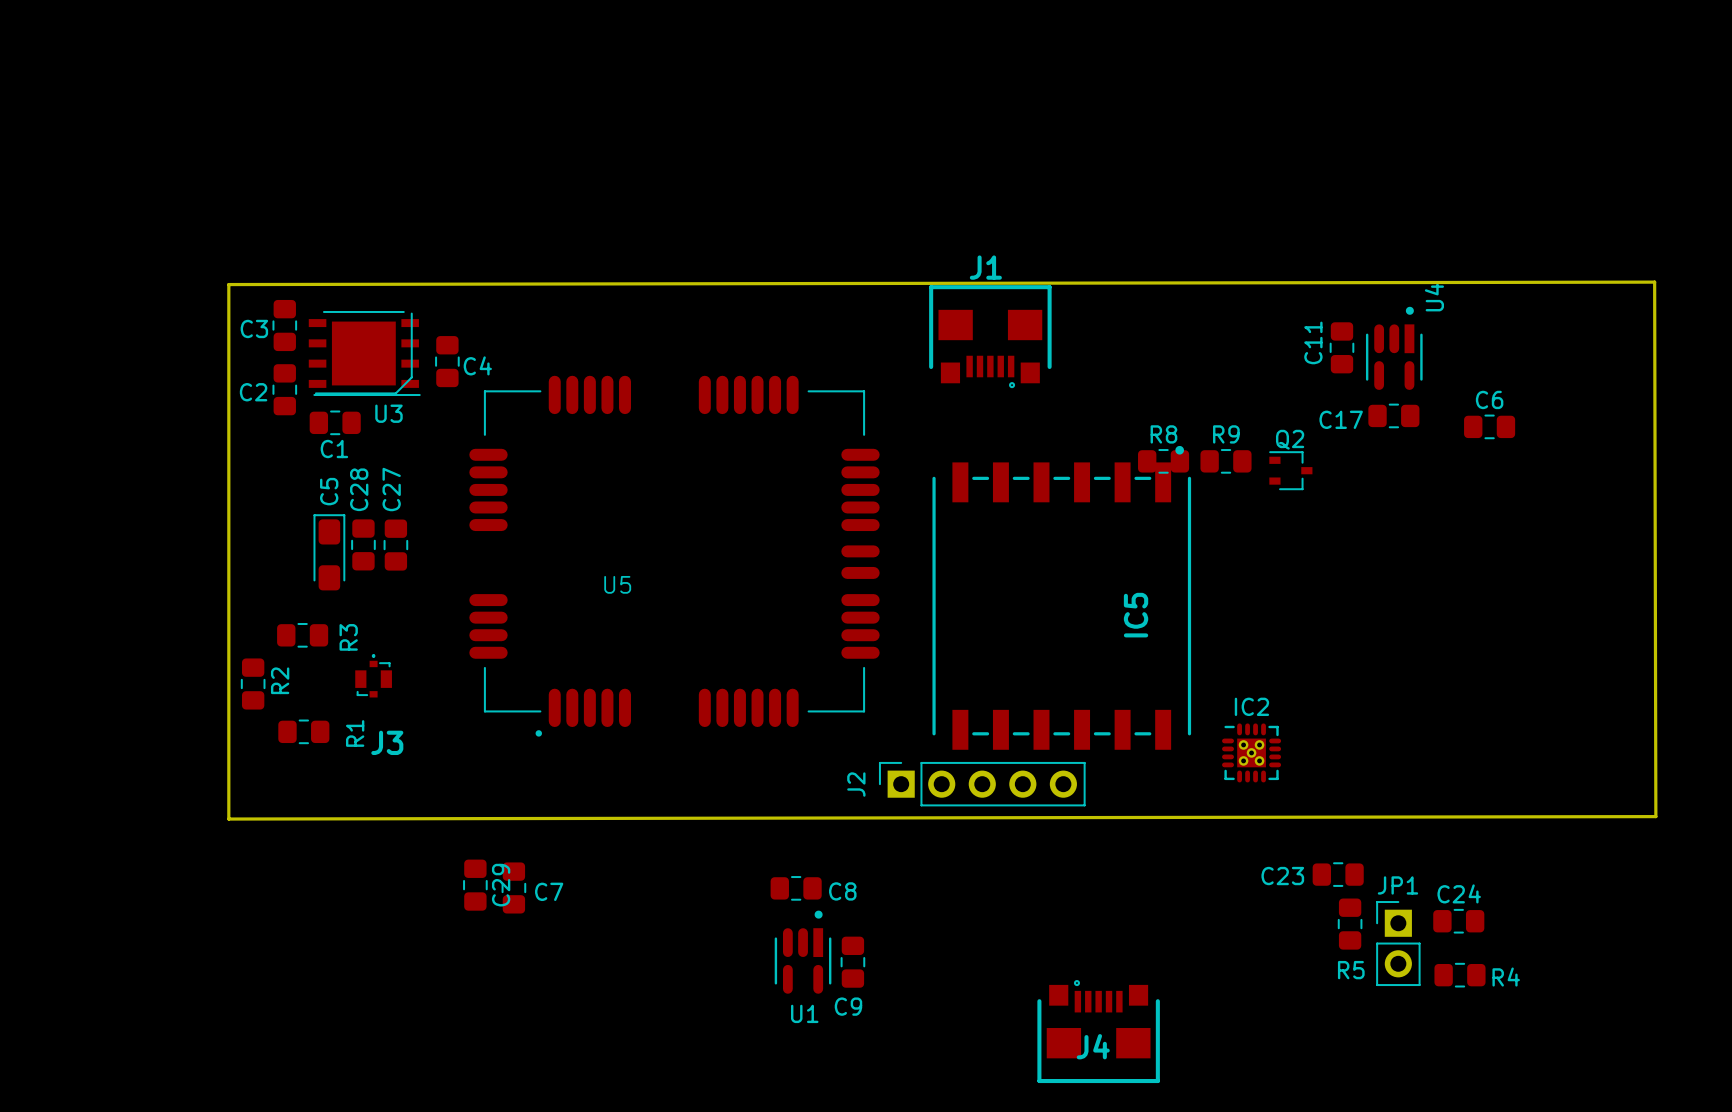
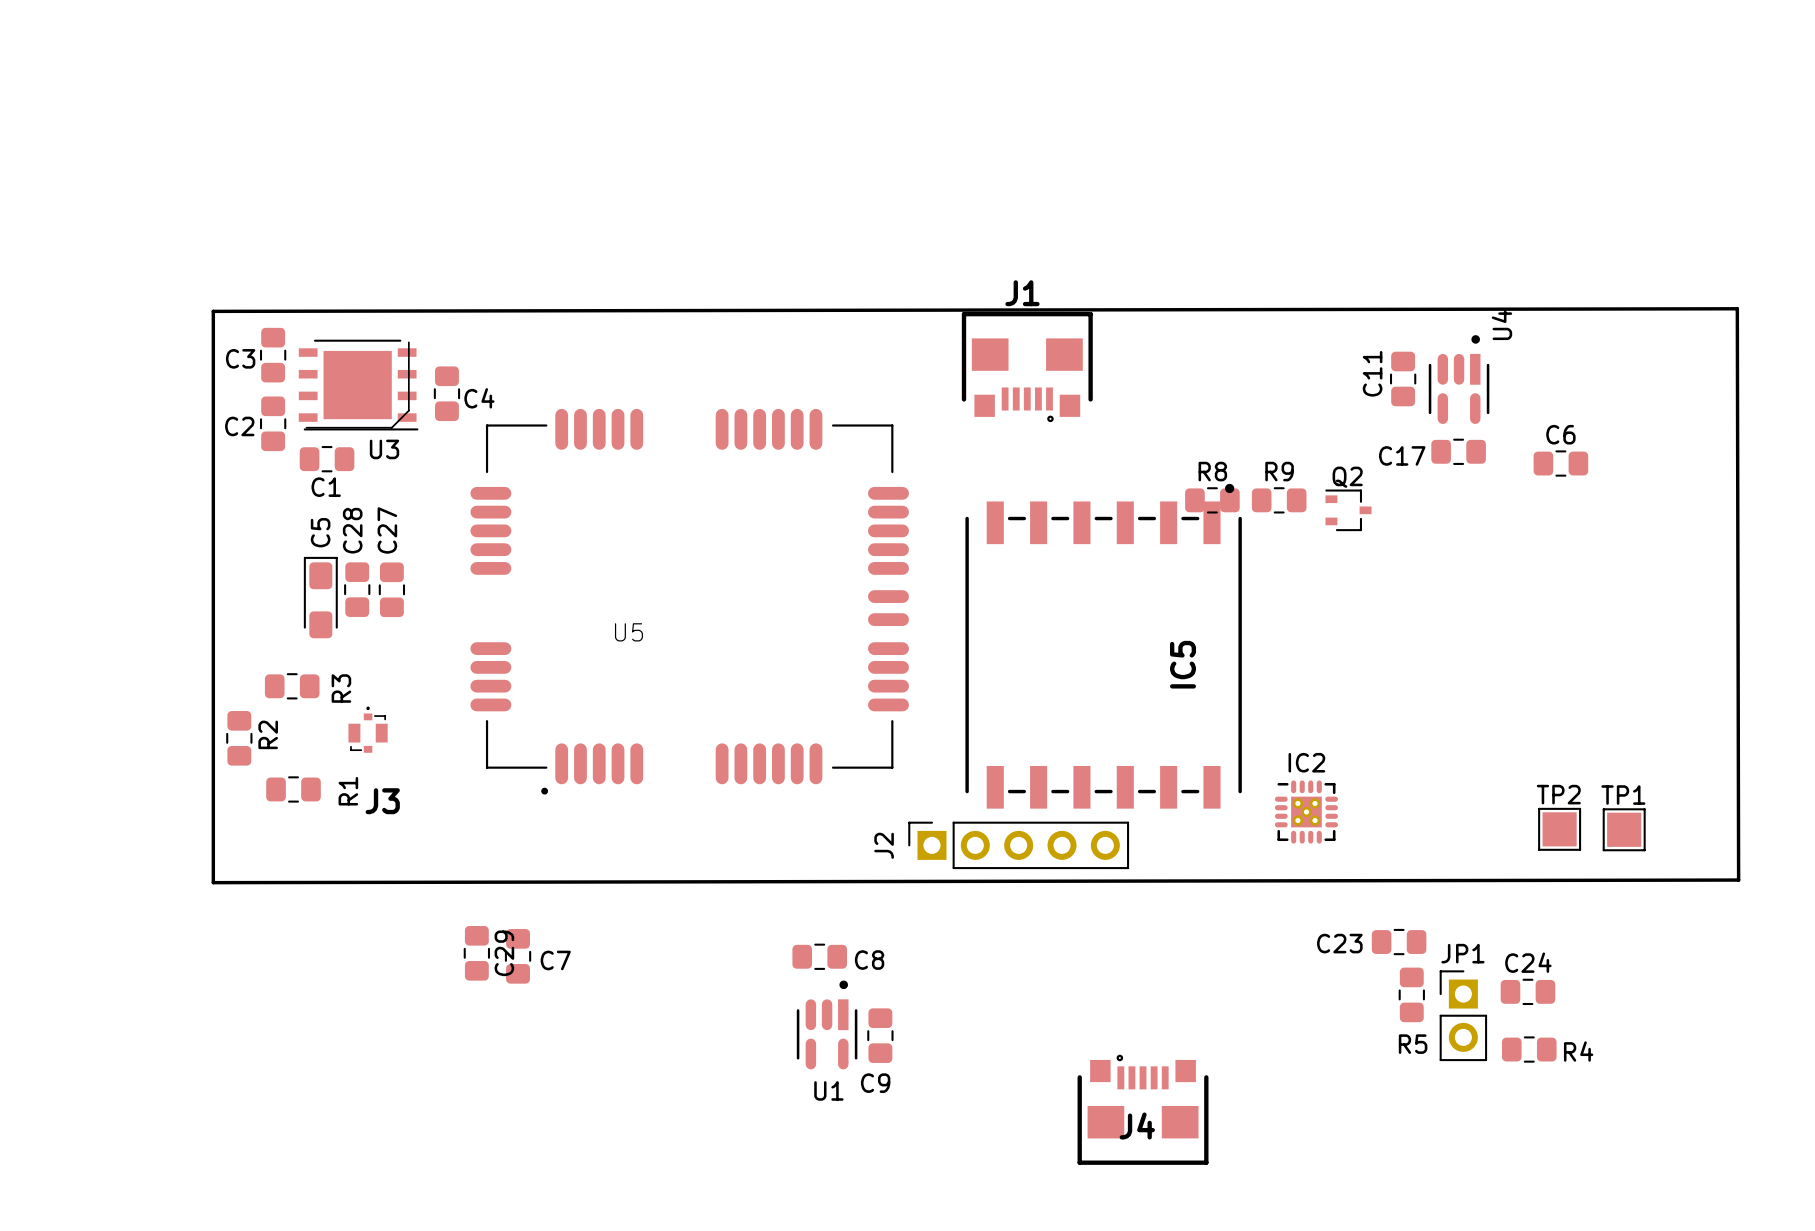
TP2: none -> (1559, 829)
TP1: none -> (1624, 829)

